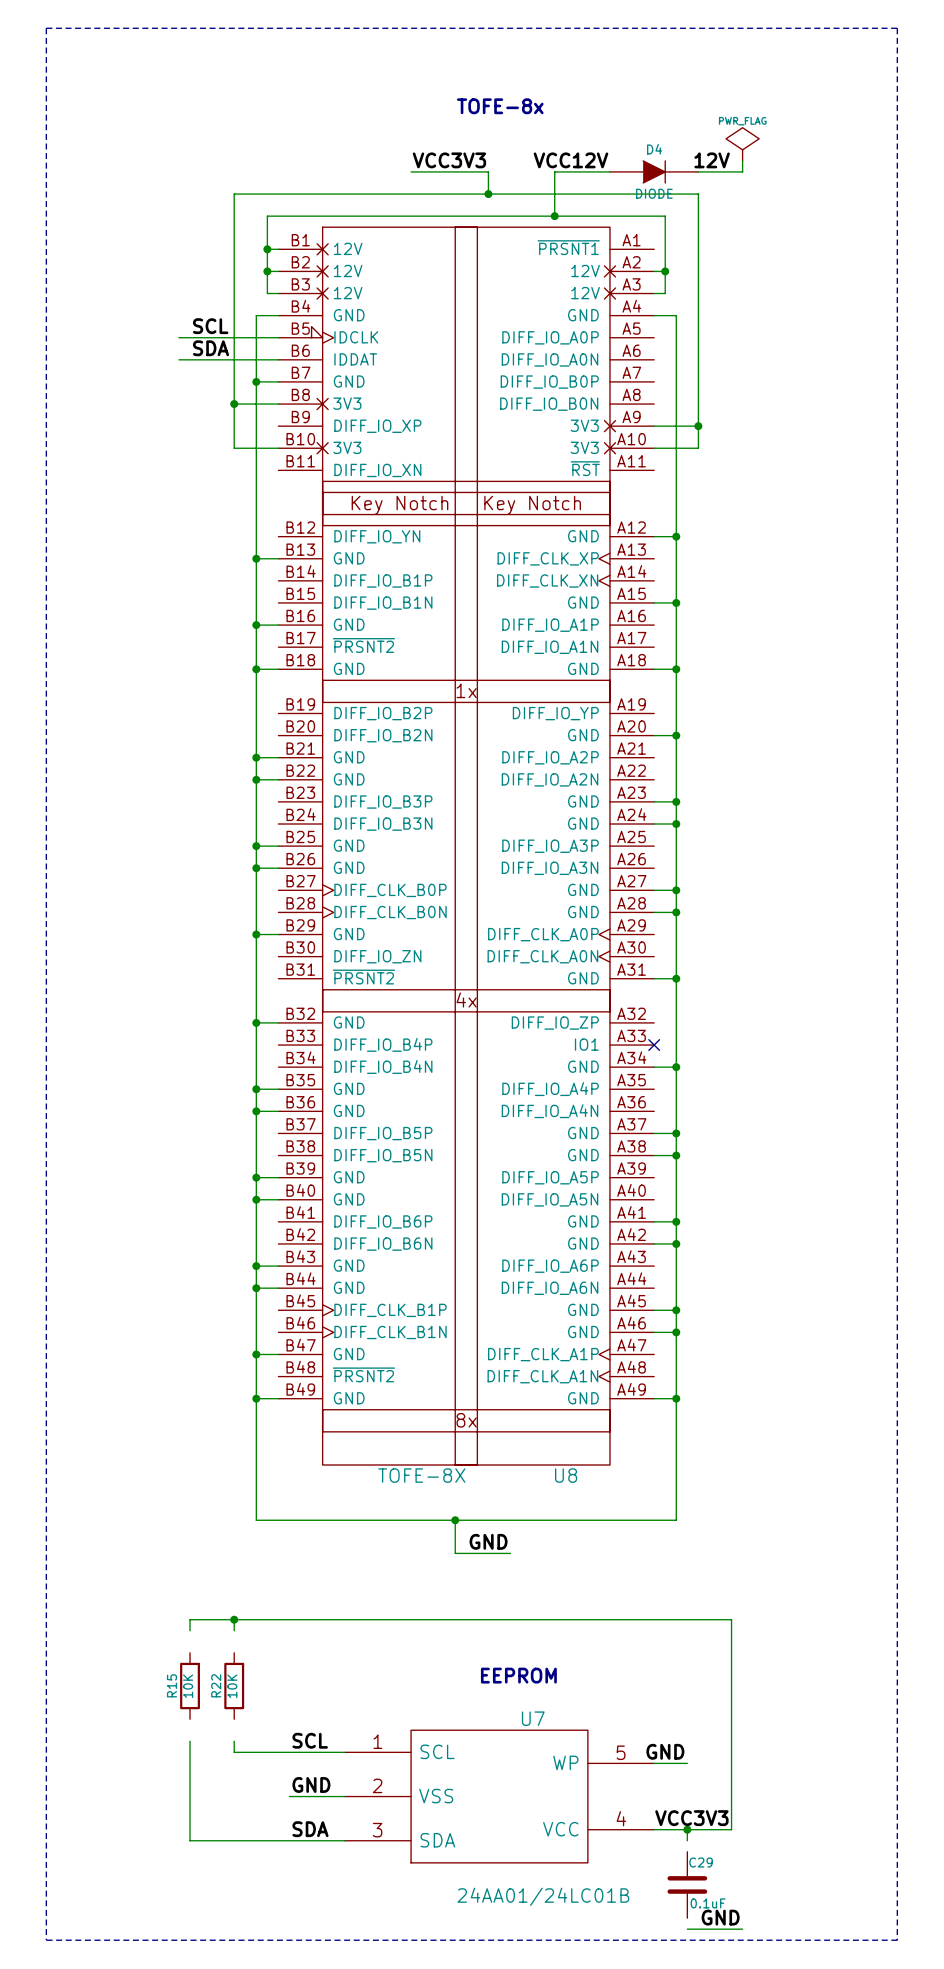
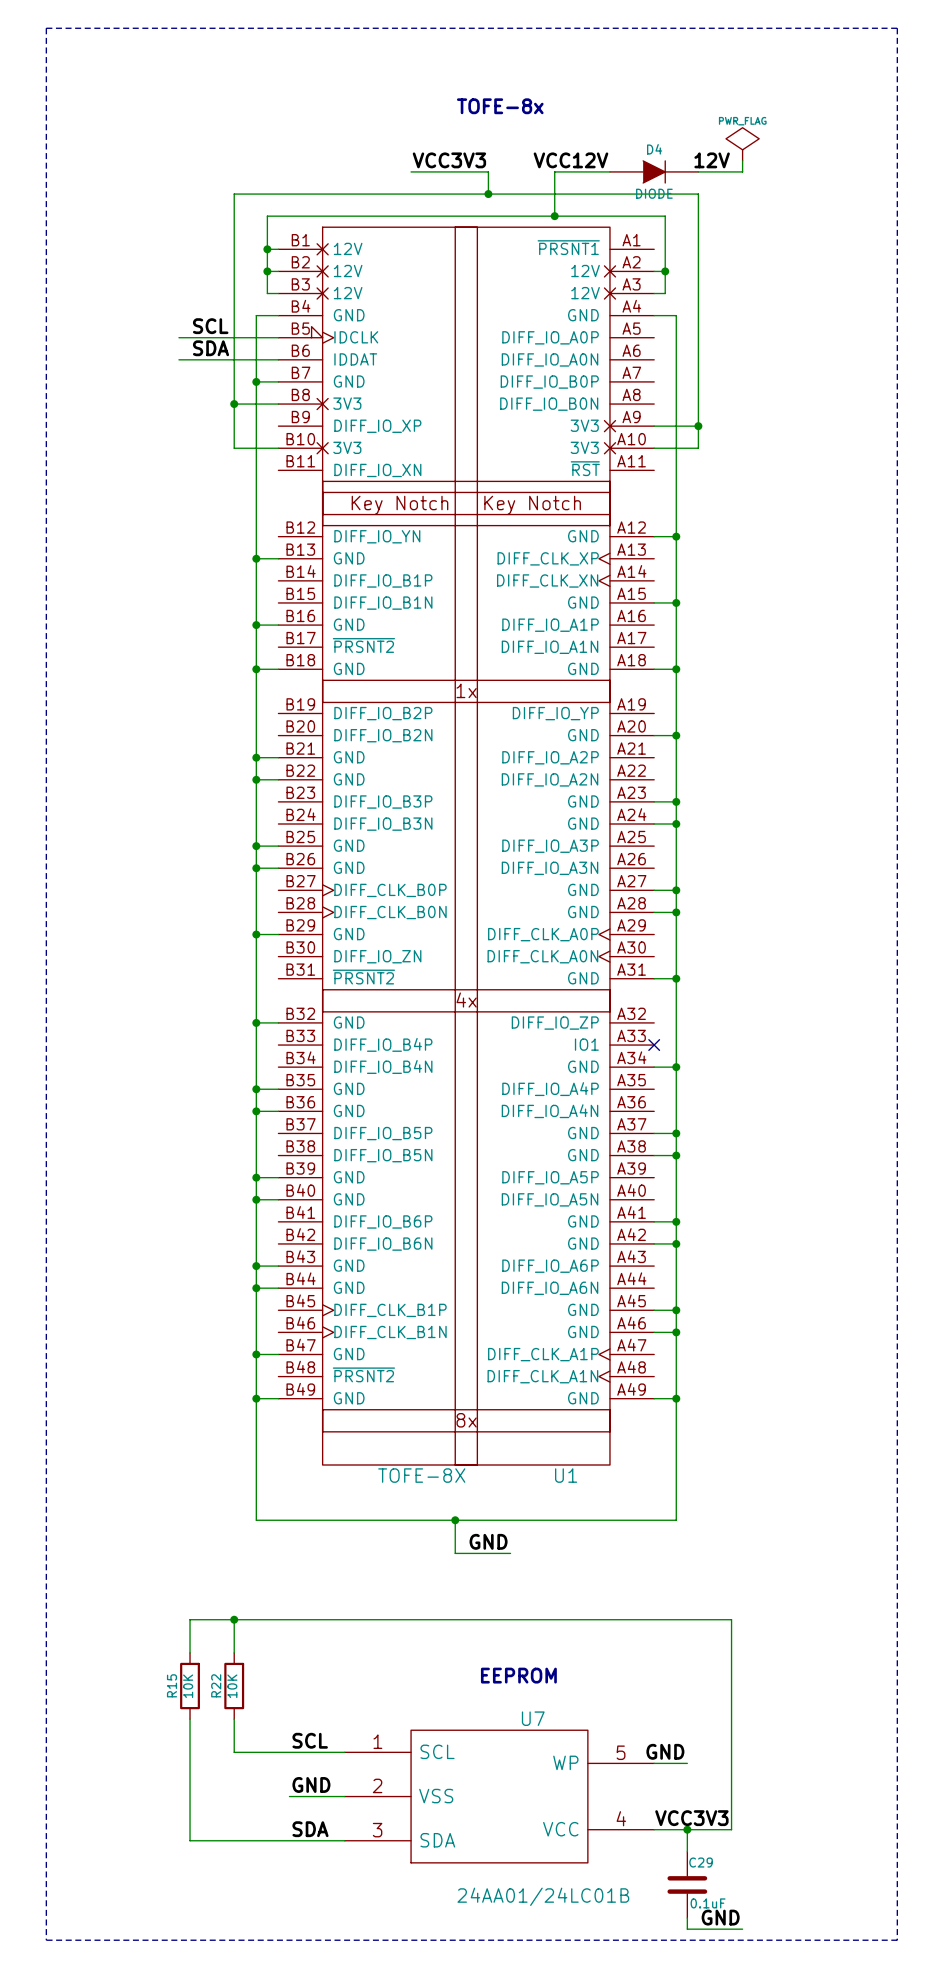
U8 name: U8 (566, 1475) -> U1 (566, 1475)
wire: none -> (190, 1630) (190, 1652)
wire: none -> (234, 1630) (234, 1652)
wire: none -> (190, 1719) (190, 1741)
wire: none -> (234, 1719) (234, 1741)
wire: none -> (687, 1840) (687, 1851)
wire: none -> (687, 1918) (687, 1929)

